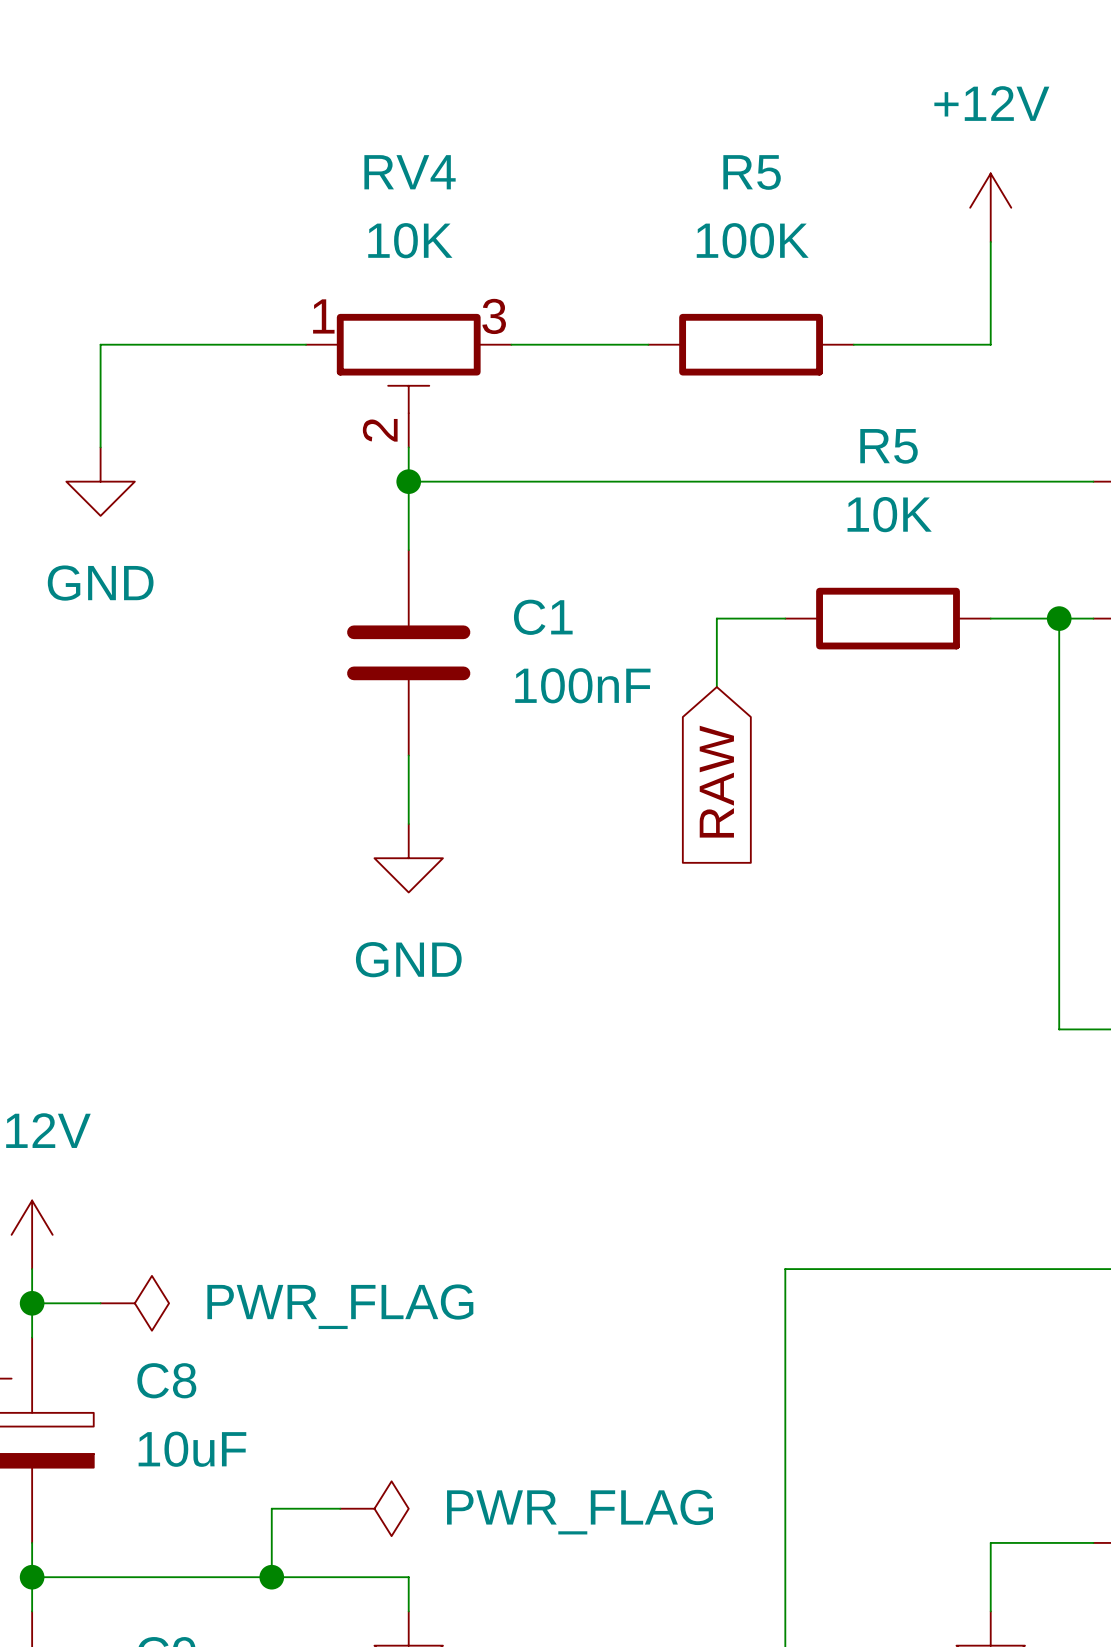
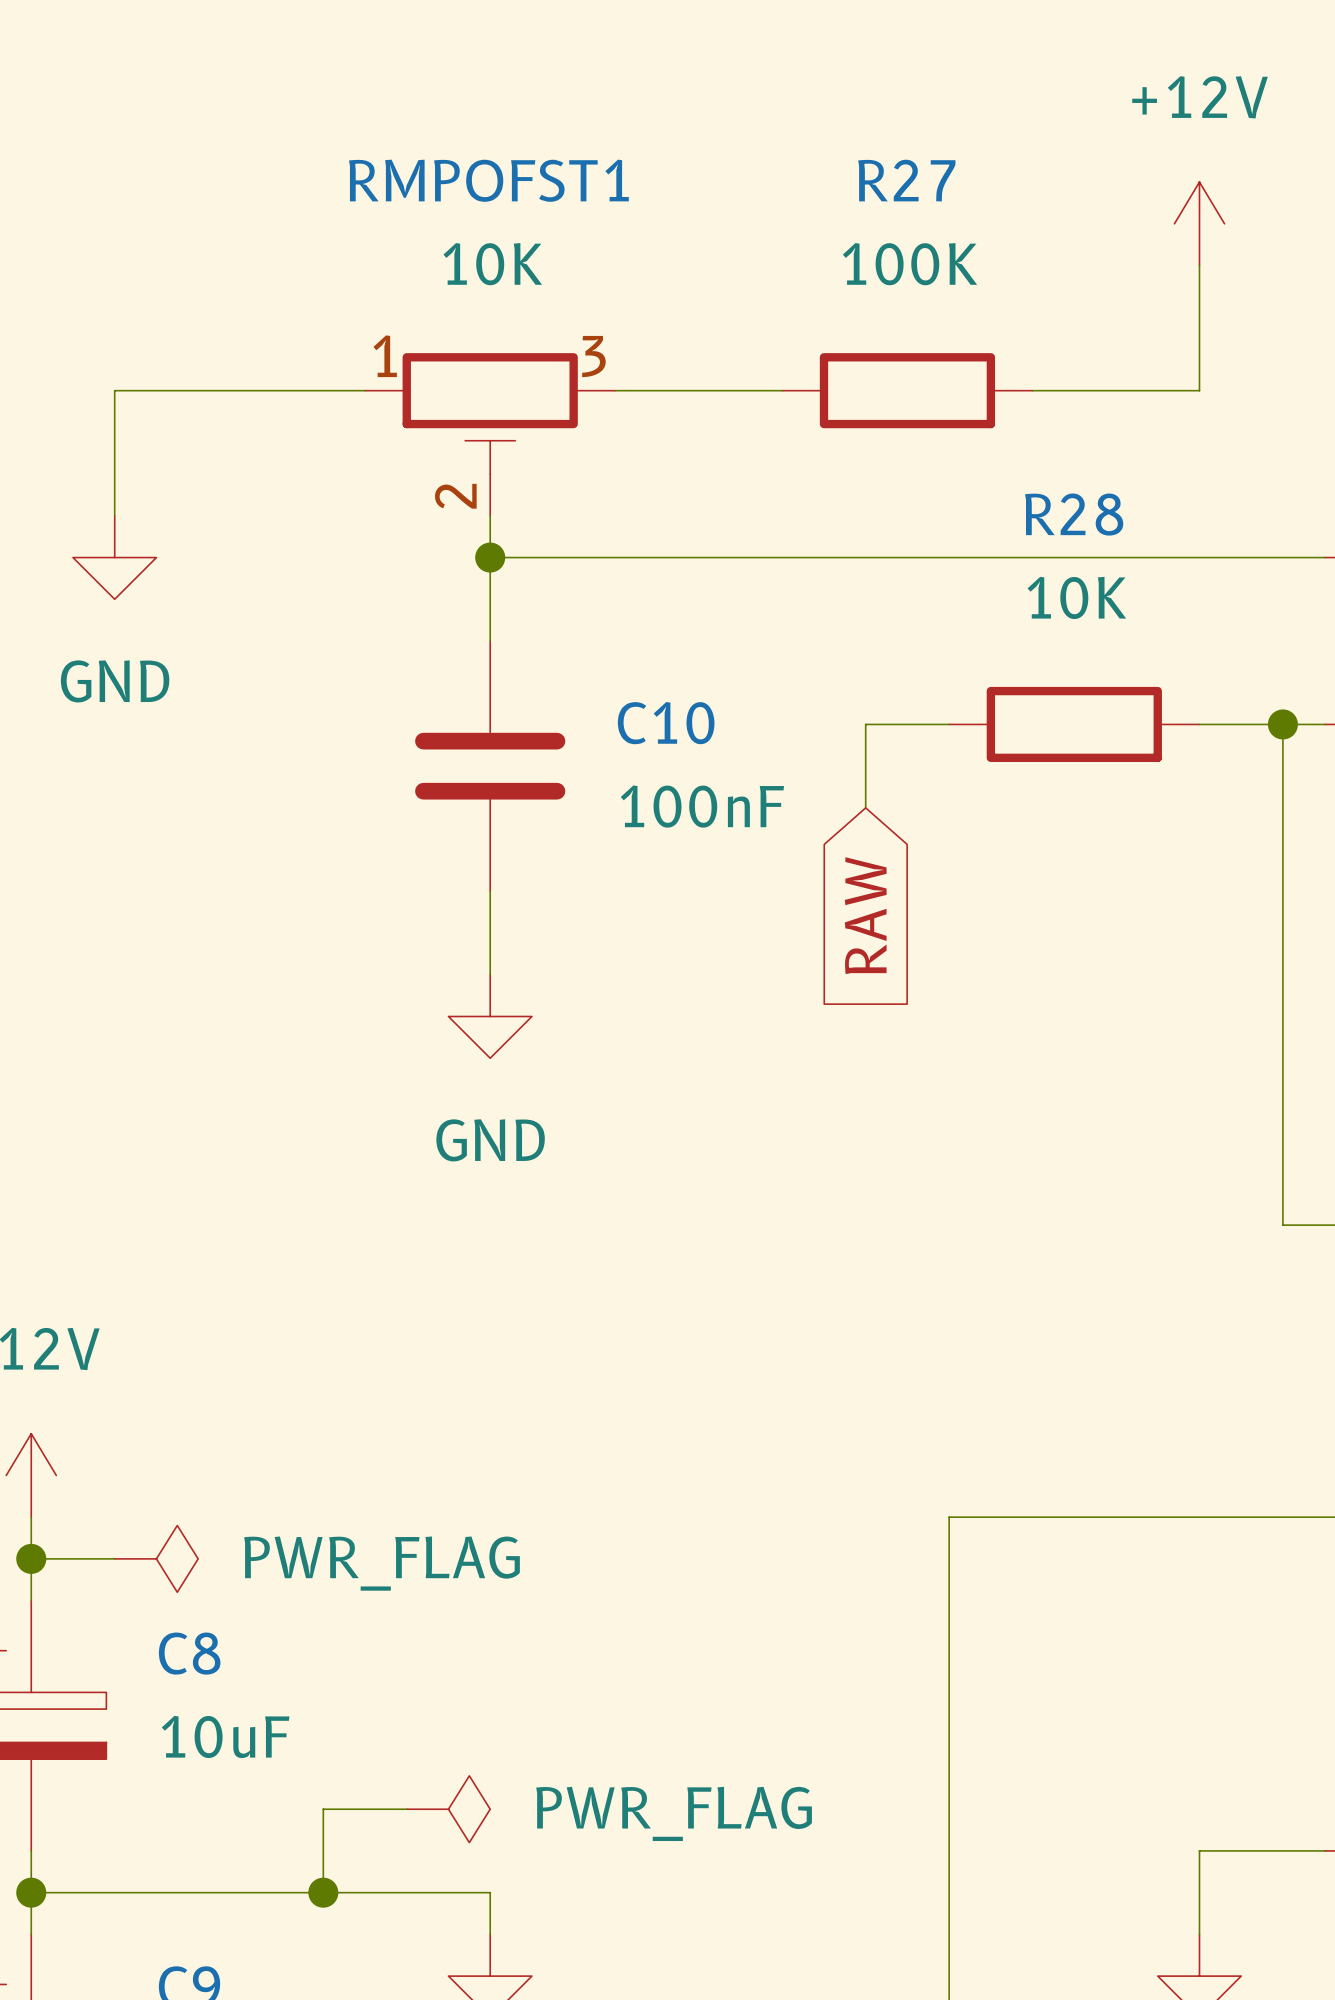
RV4 name: RV4 (410, 172) -> RMPOFST1 (488, 180)
R5 name: R5 (752, 172) -> R27 (906, 180)
R5 name: R5 (889, 446) -> R28 (1074, 514)
C1 name: C1 (543, 617) -> C10 (666, 723)

